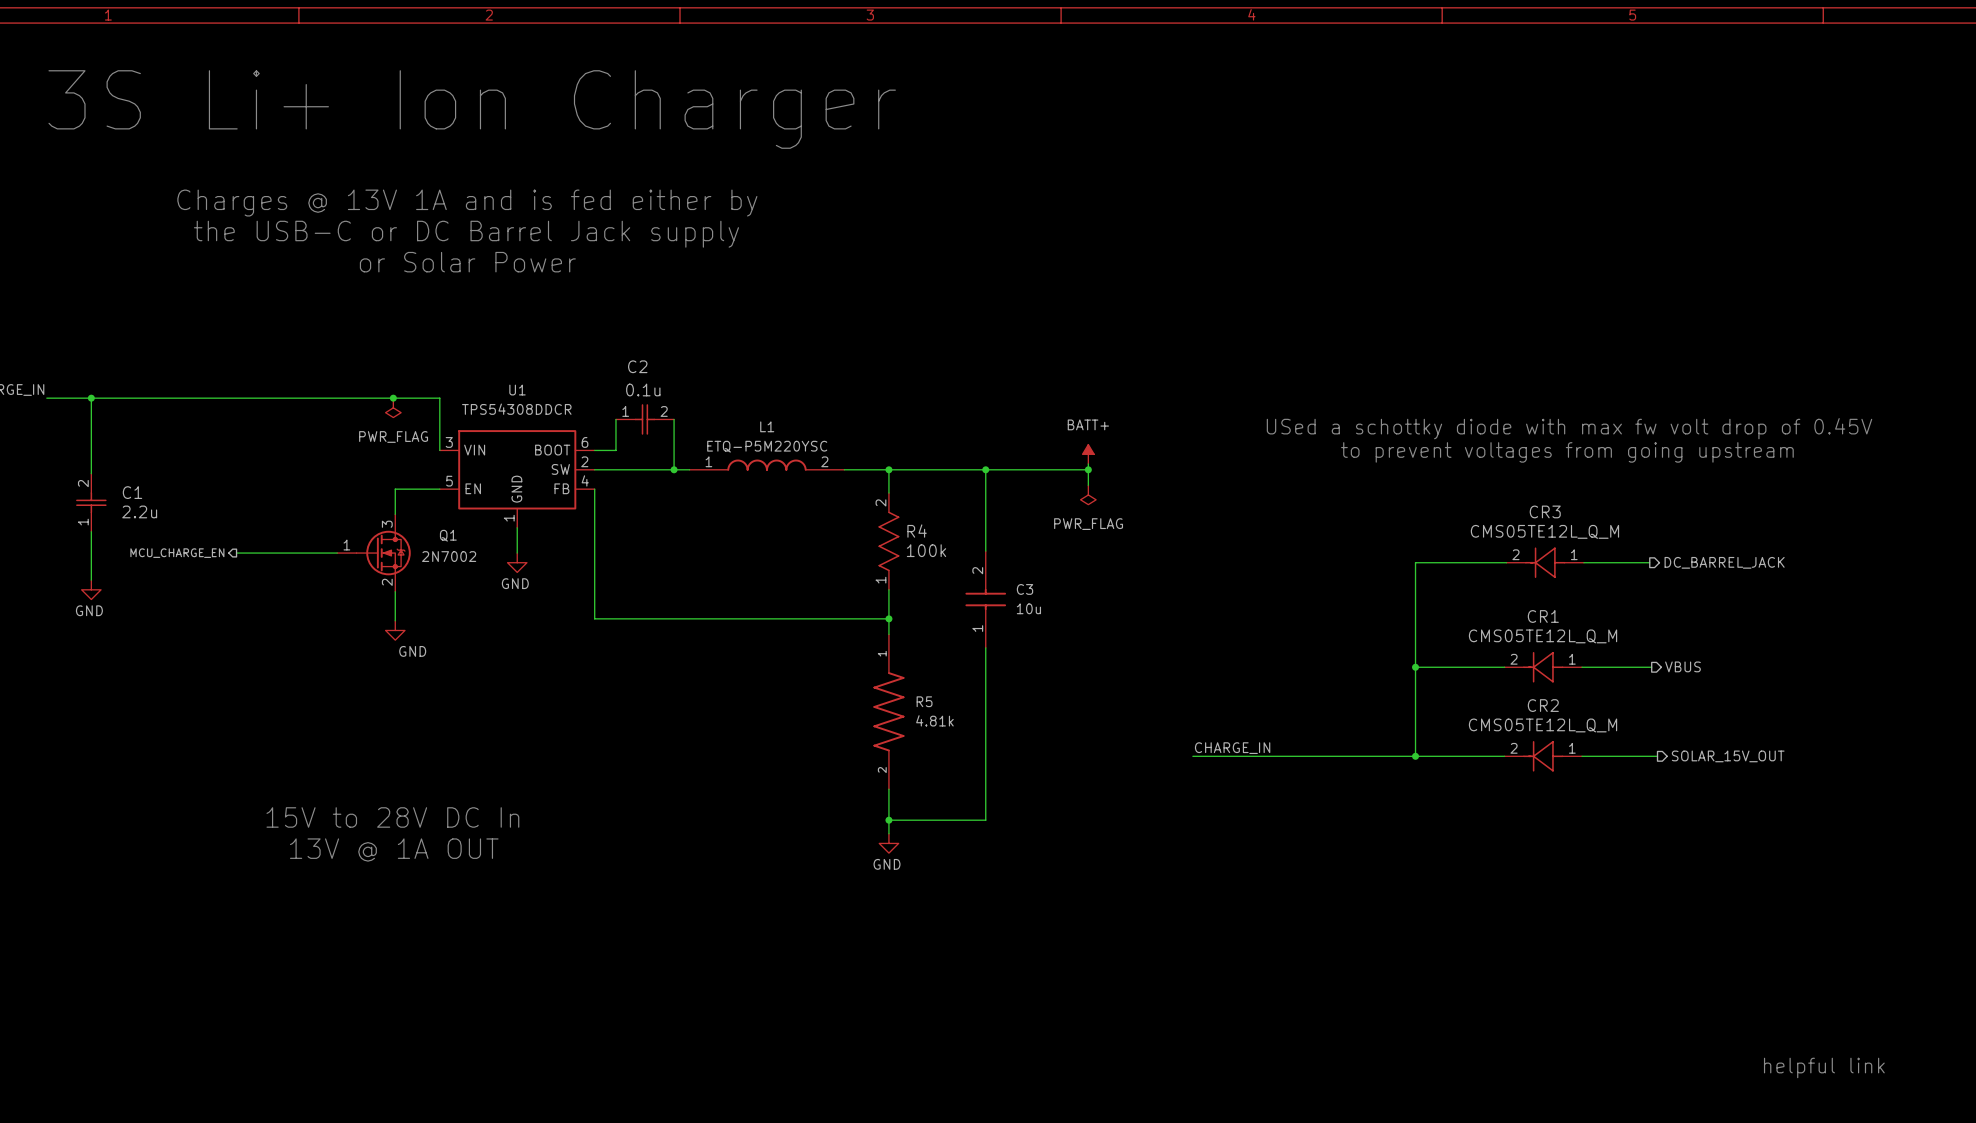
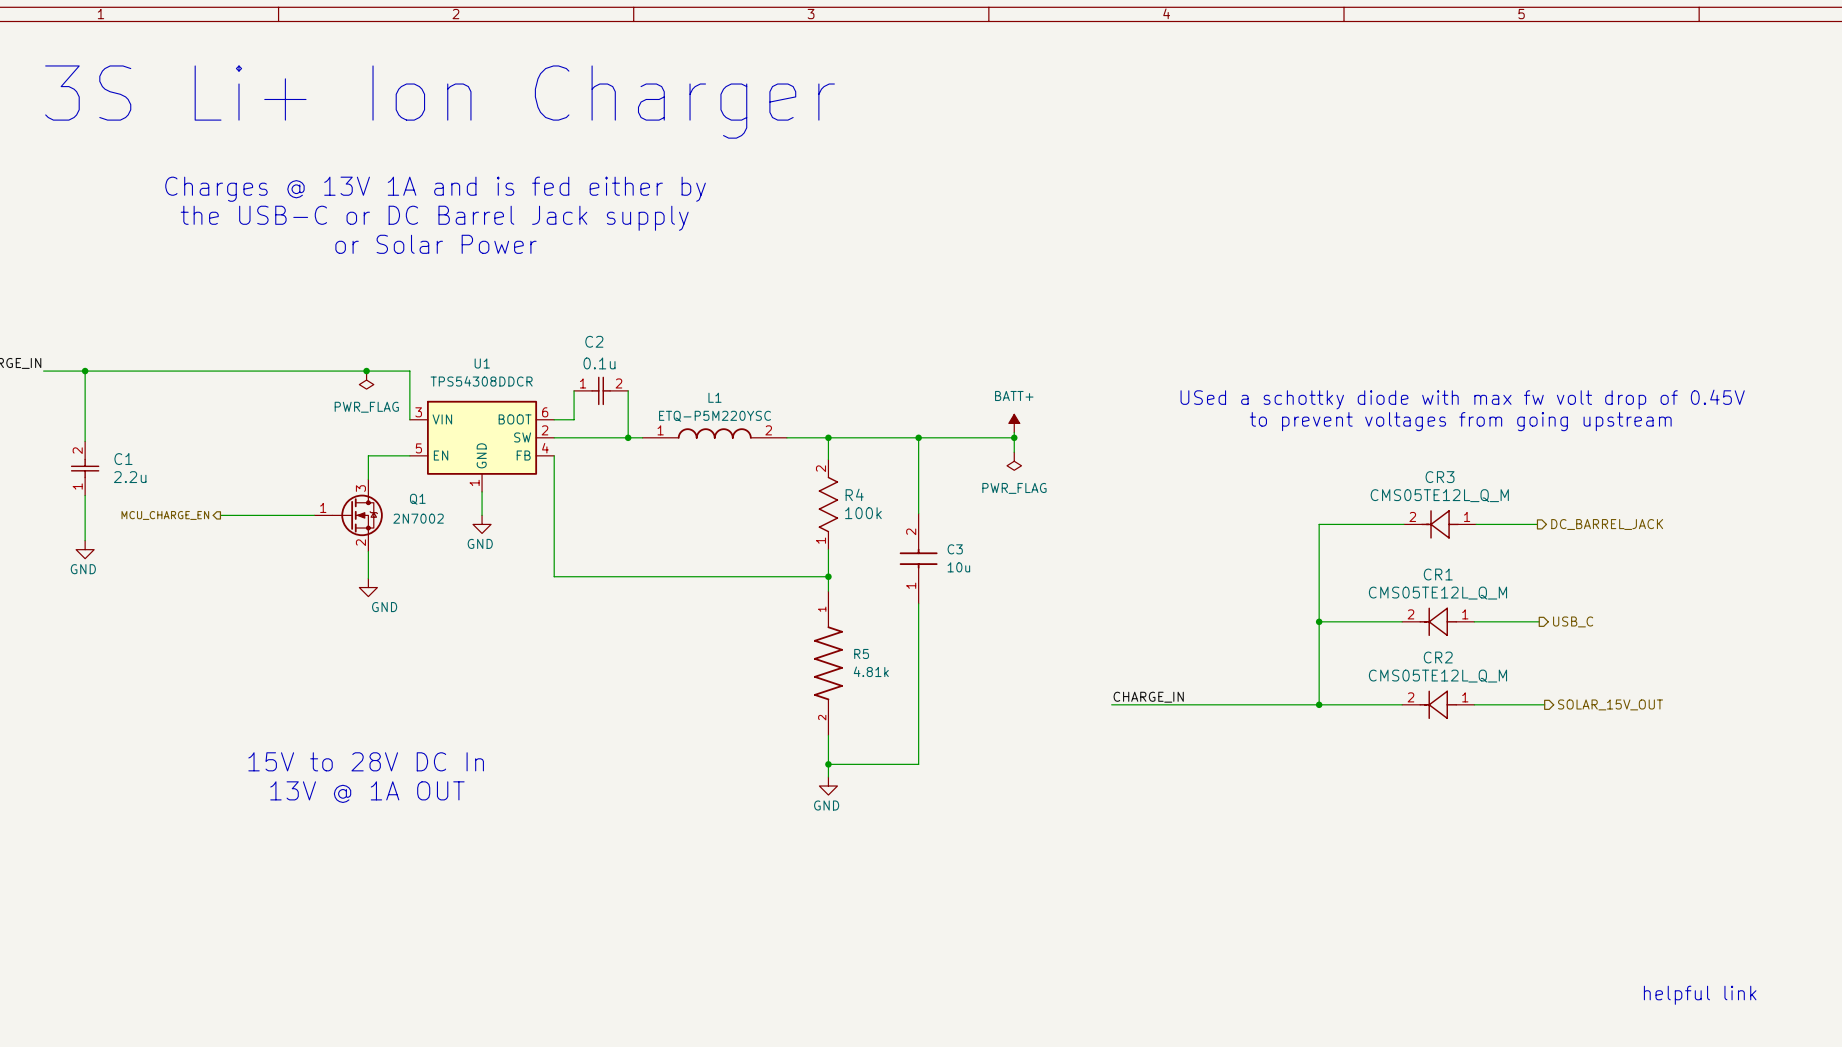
hierarchical label: VBUS (1682, 666) -> USB_C (1573, 621)

